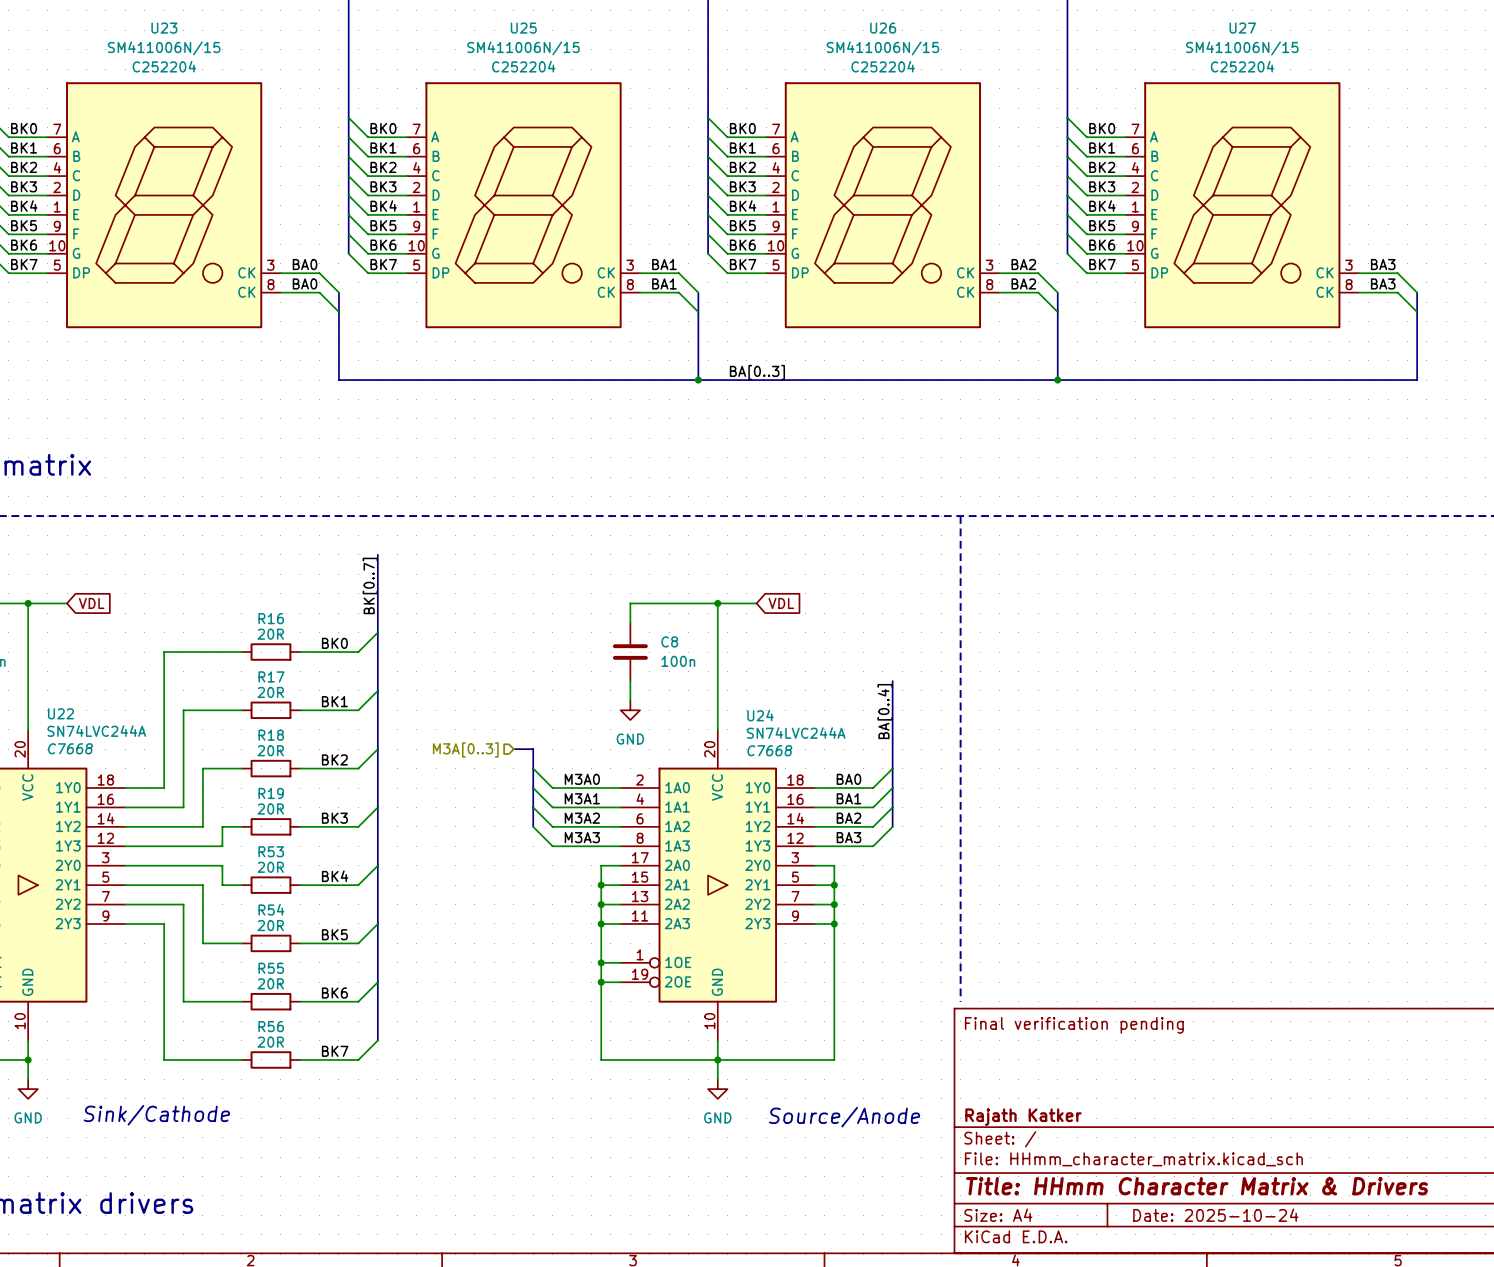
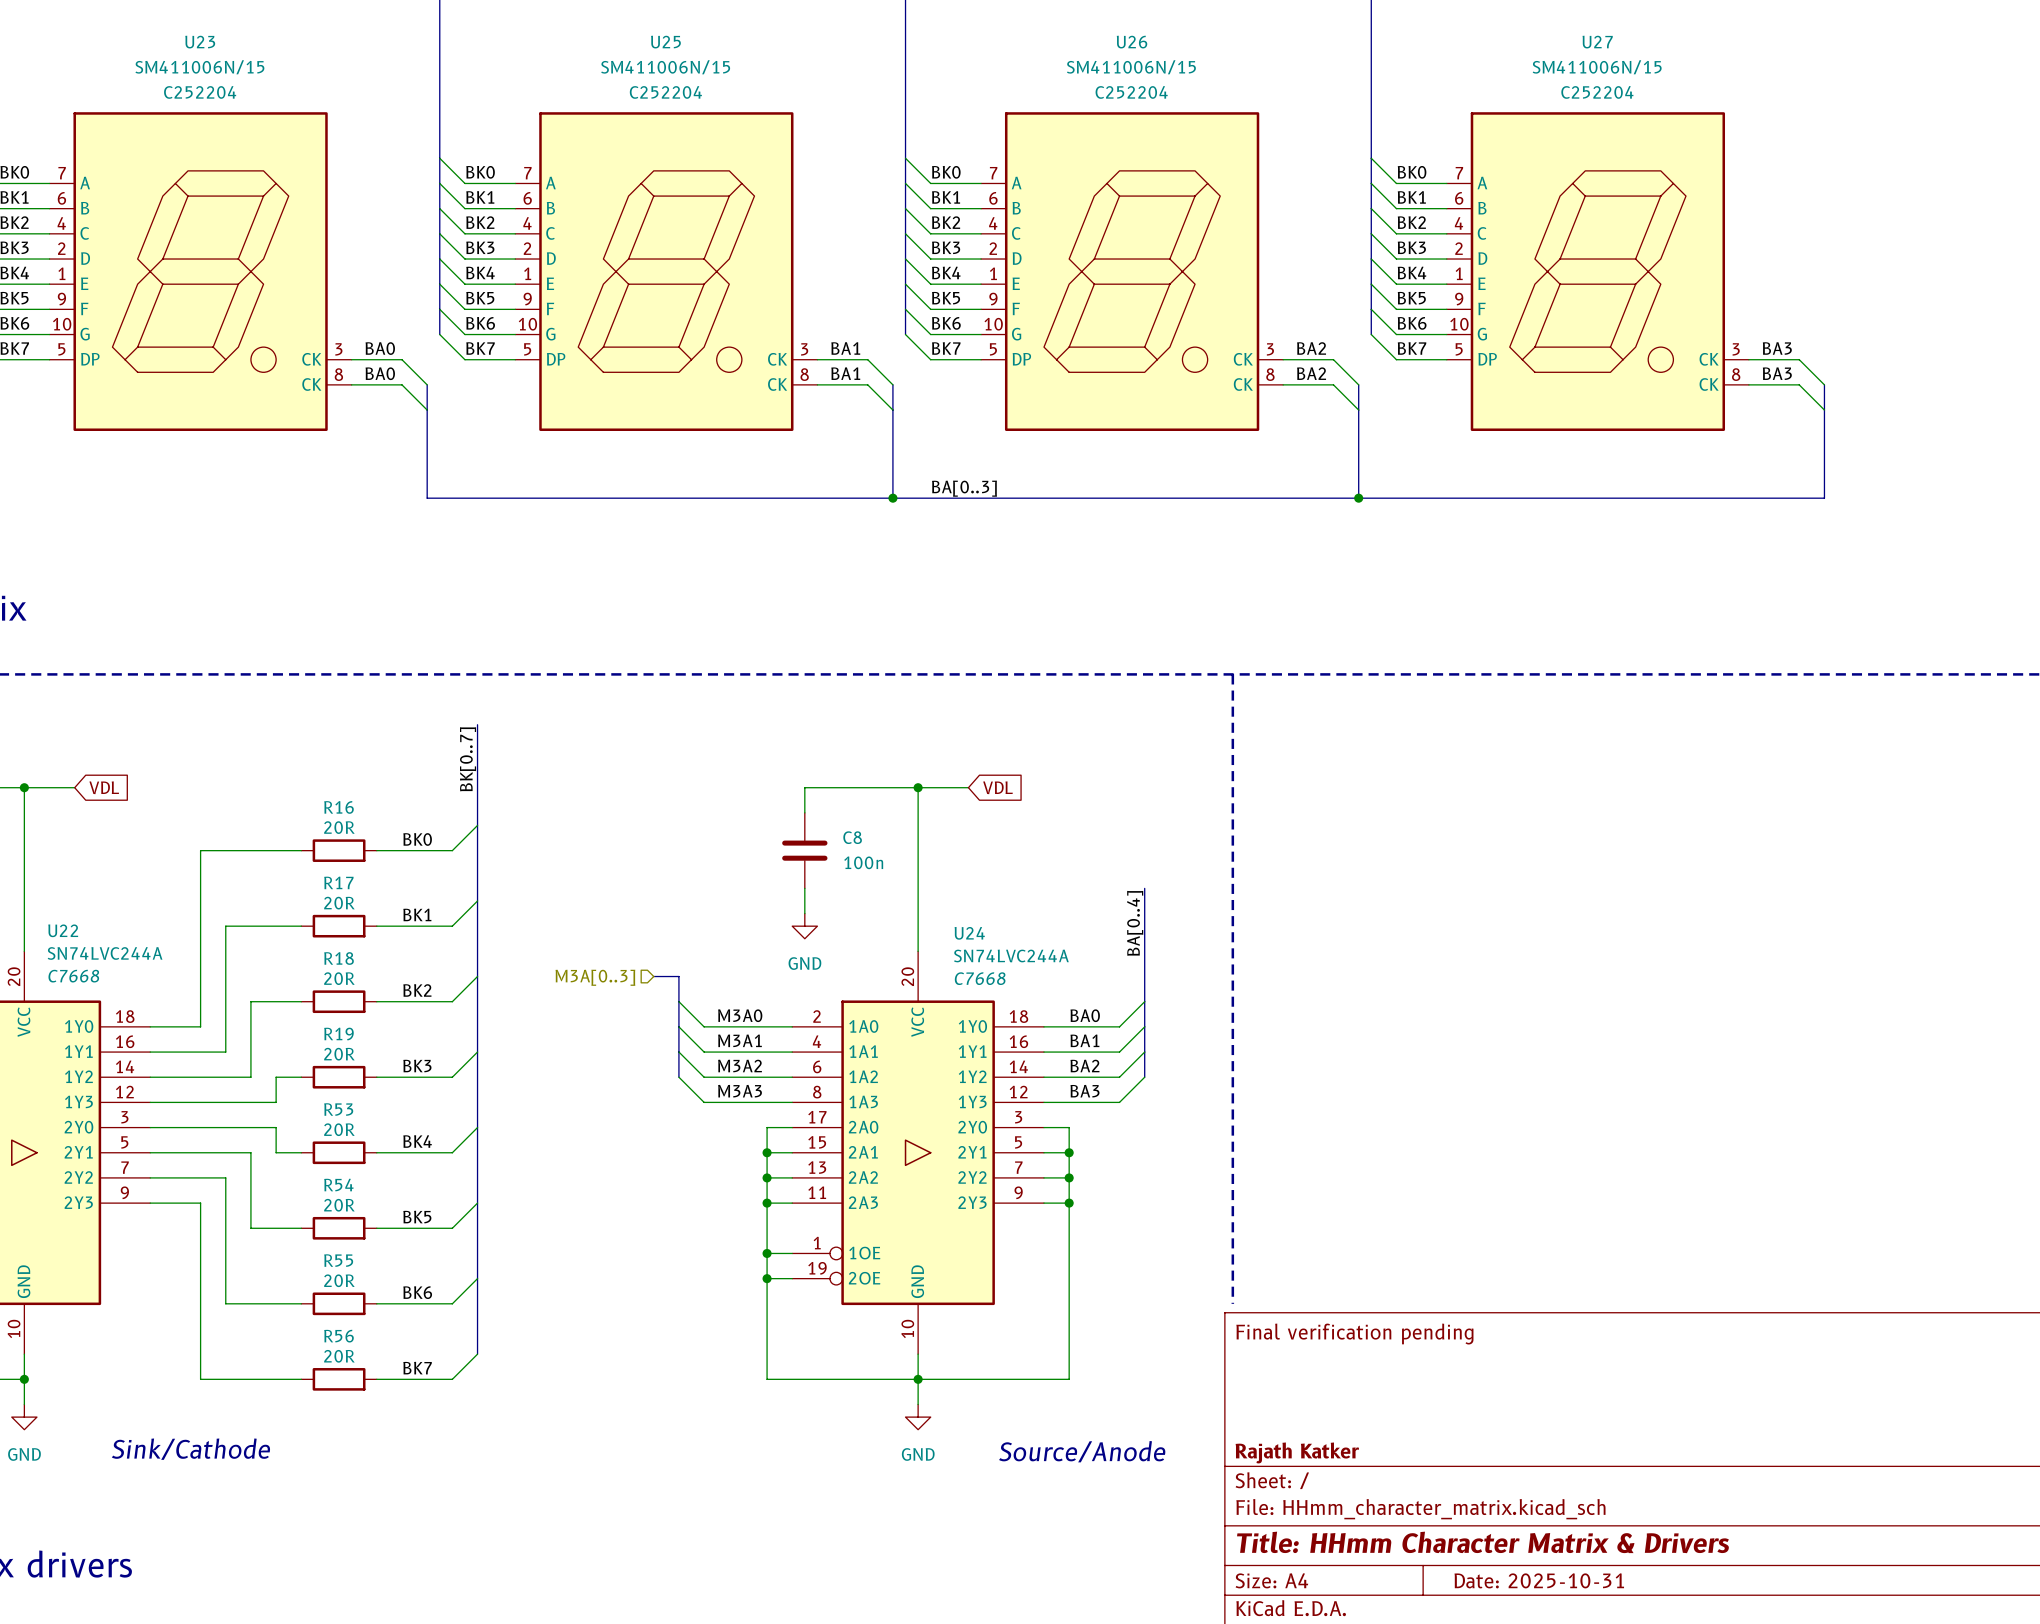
title block: Date: 2025-10-24 (1215, 1215) -> Date: 2025-10-31 (1539, 1580)

